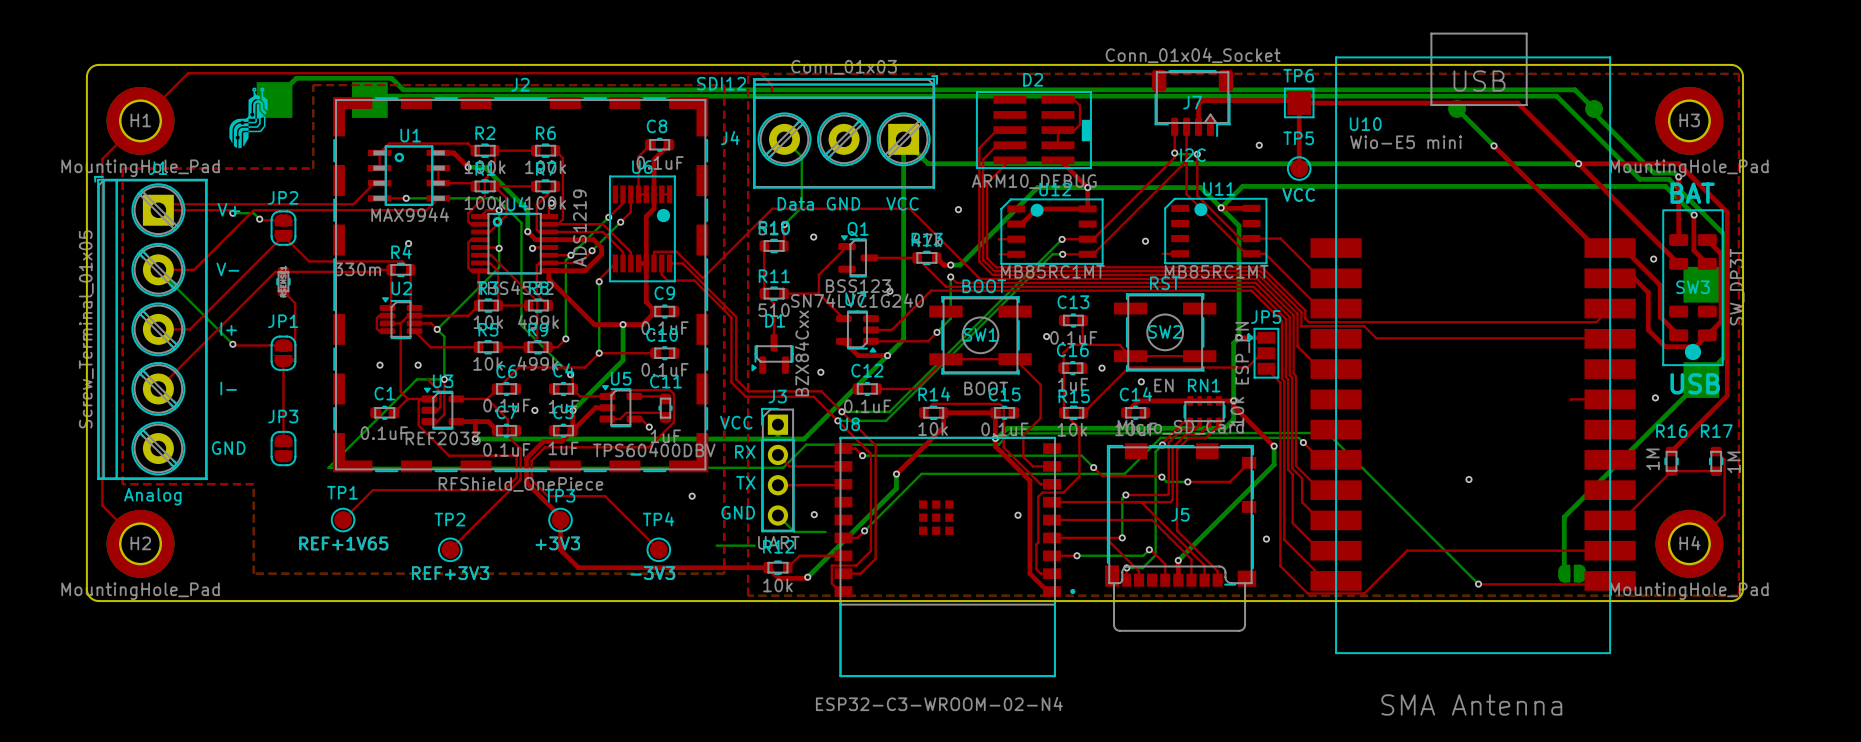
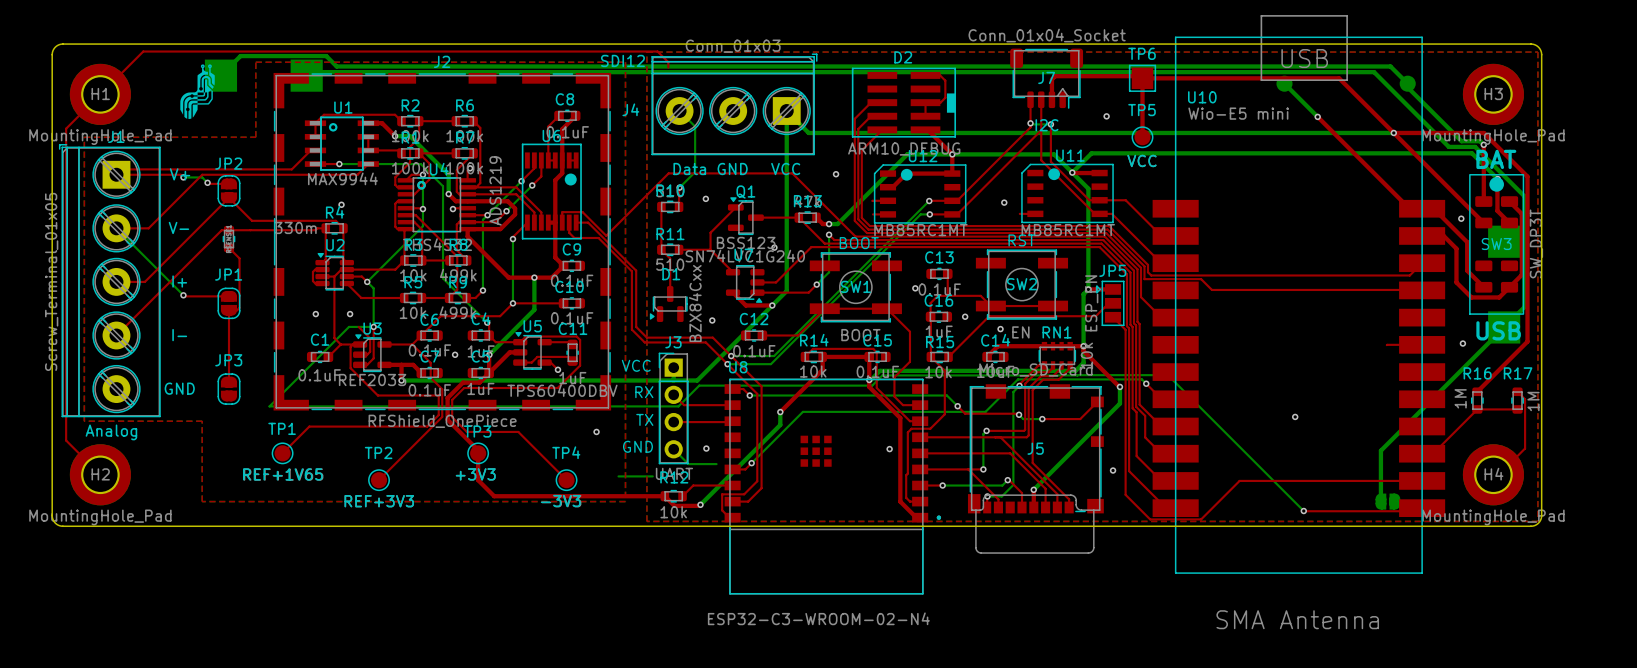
SW3 footprint: [1662, 209, 1724, 366] -> [1469, 174, 1524, 315]

